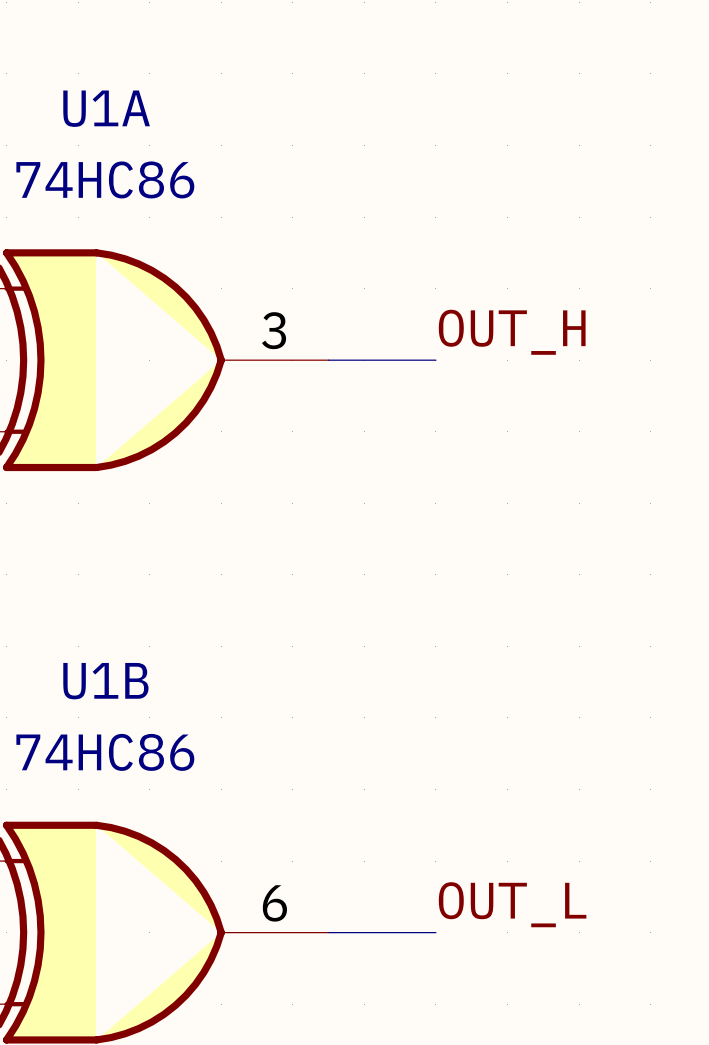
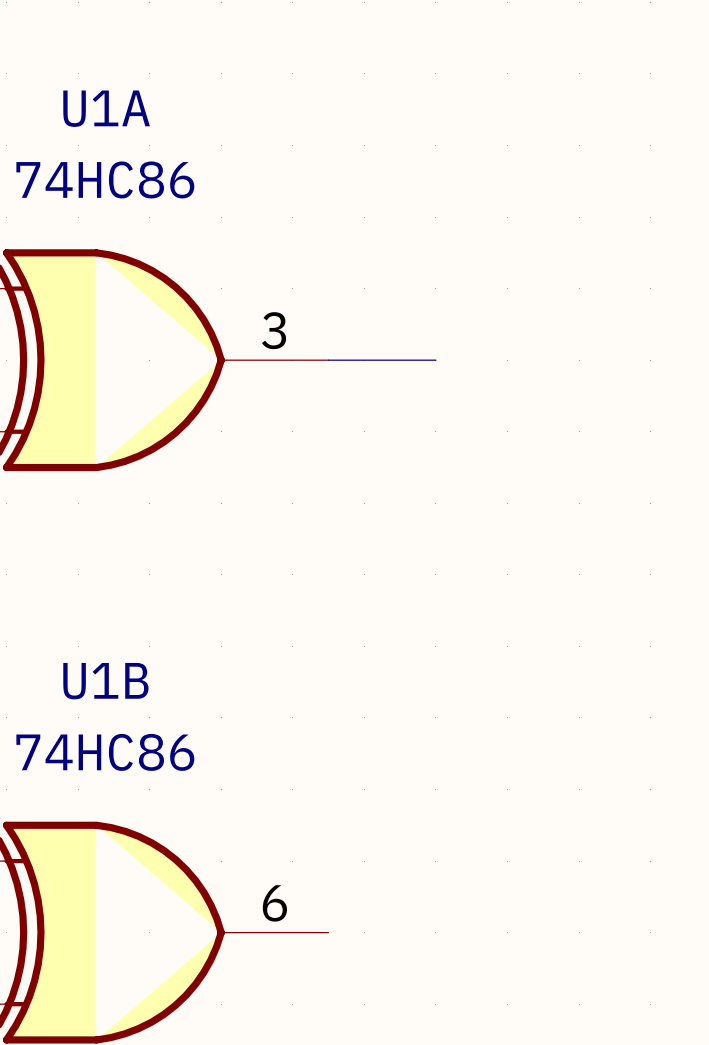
label: OUT_H (512, 332) -> none
label: OUT_L (512, 904) -> none
wire: (328, 932) (435, 932) -> none

